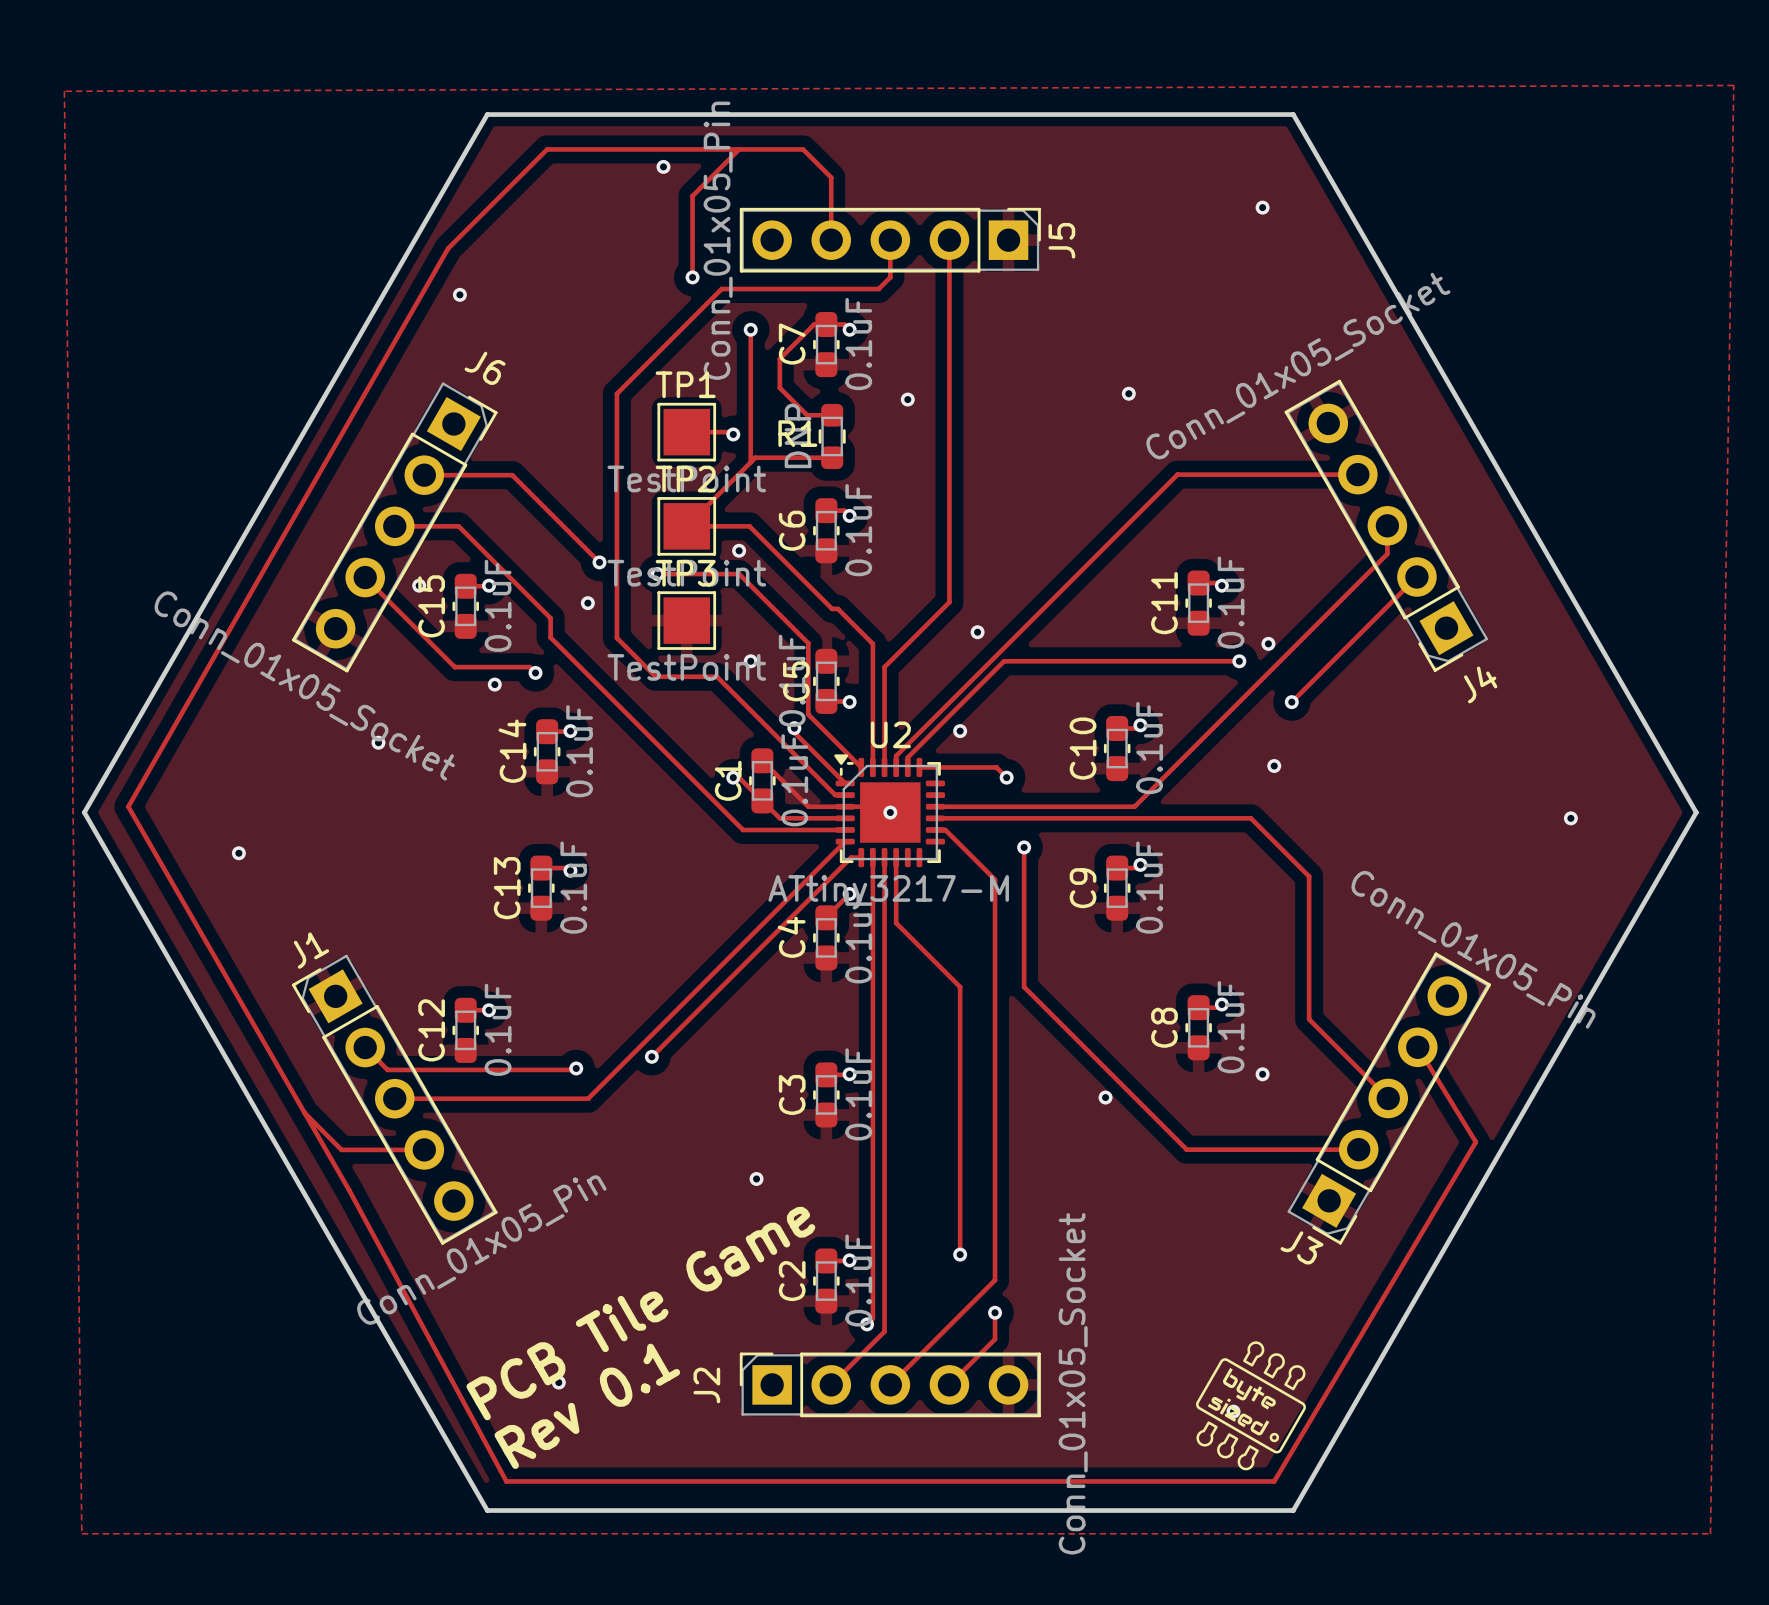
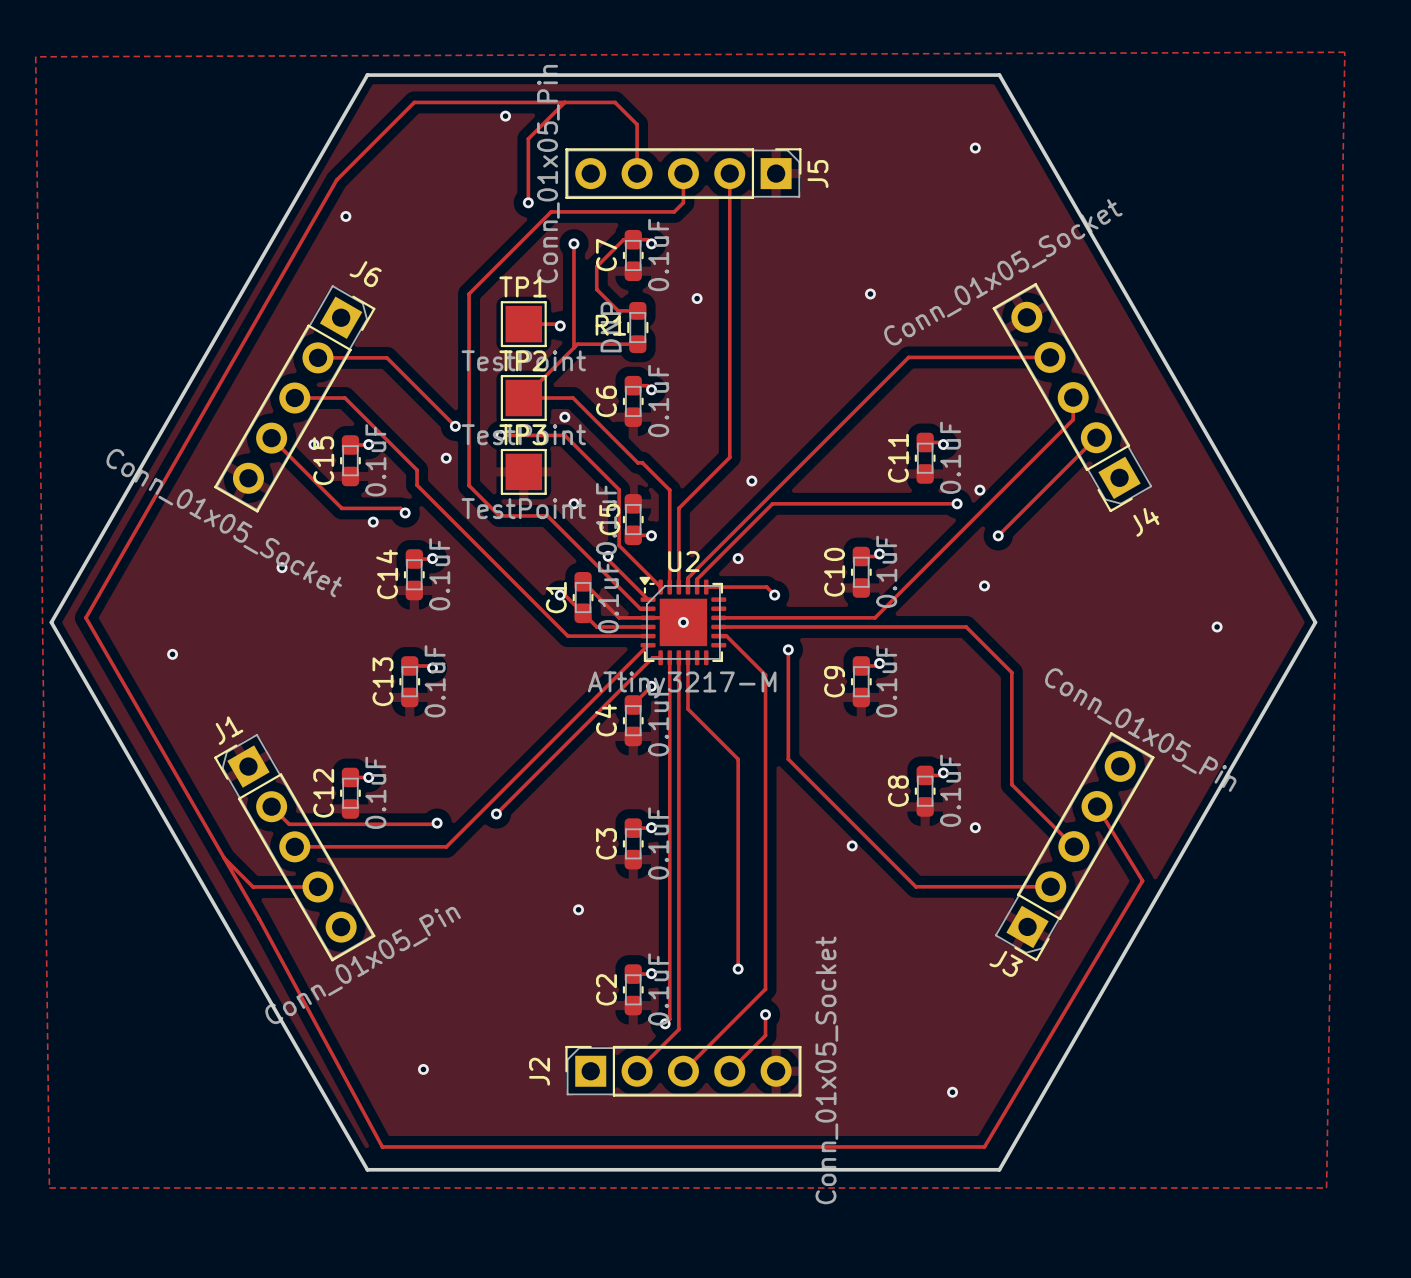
text: PCB Tile Game (640, 1313) -> none
drawing: [1196, 1341, 1306, 1471] -> none
text: Rev 0.1 (587, 1406) -> none

